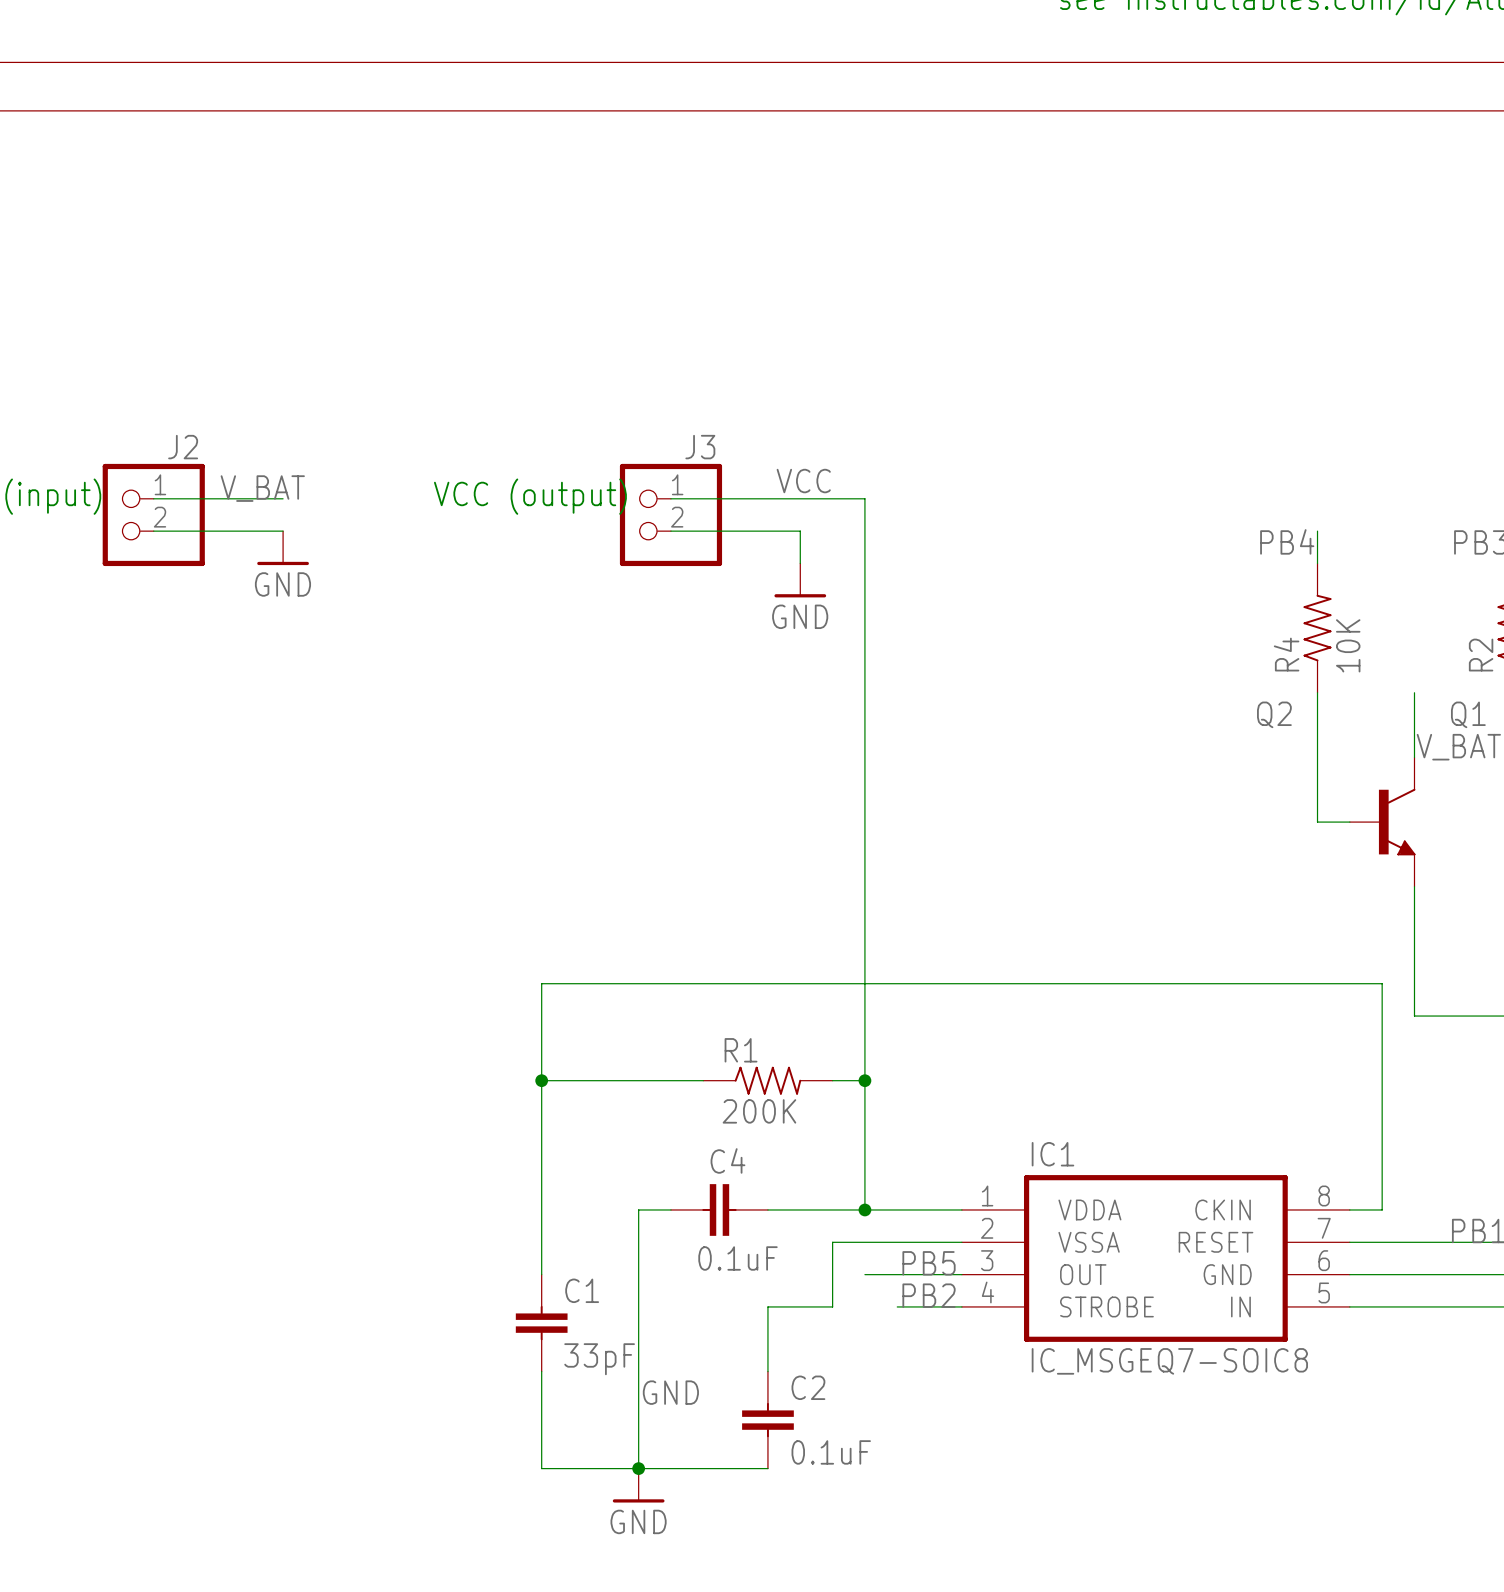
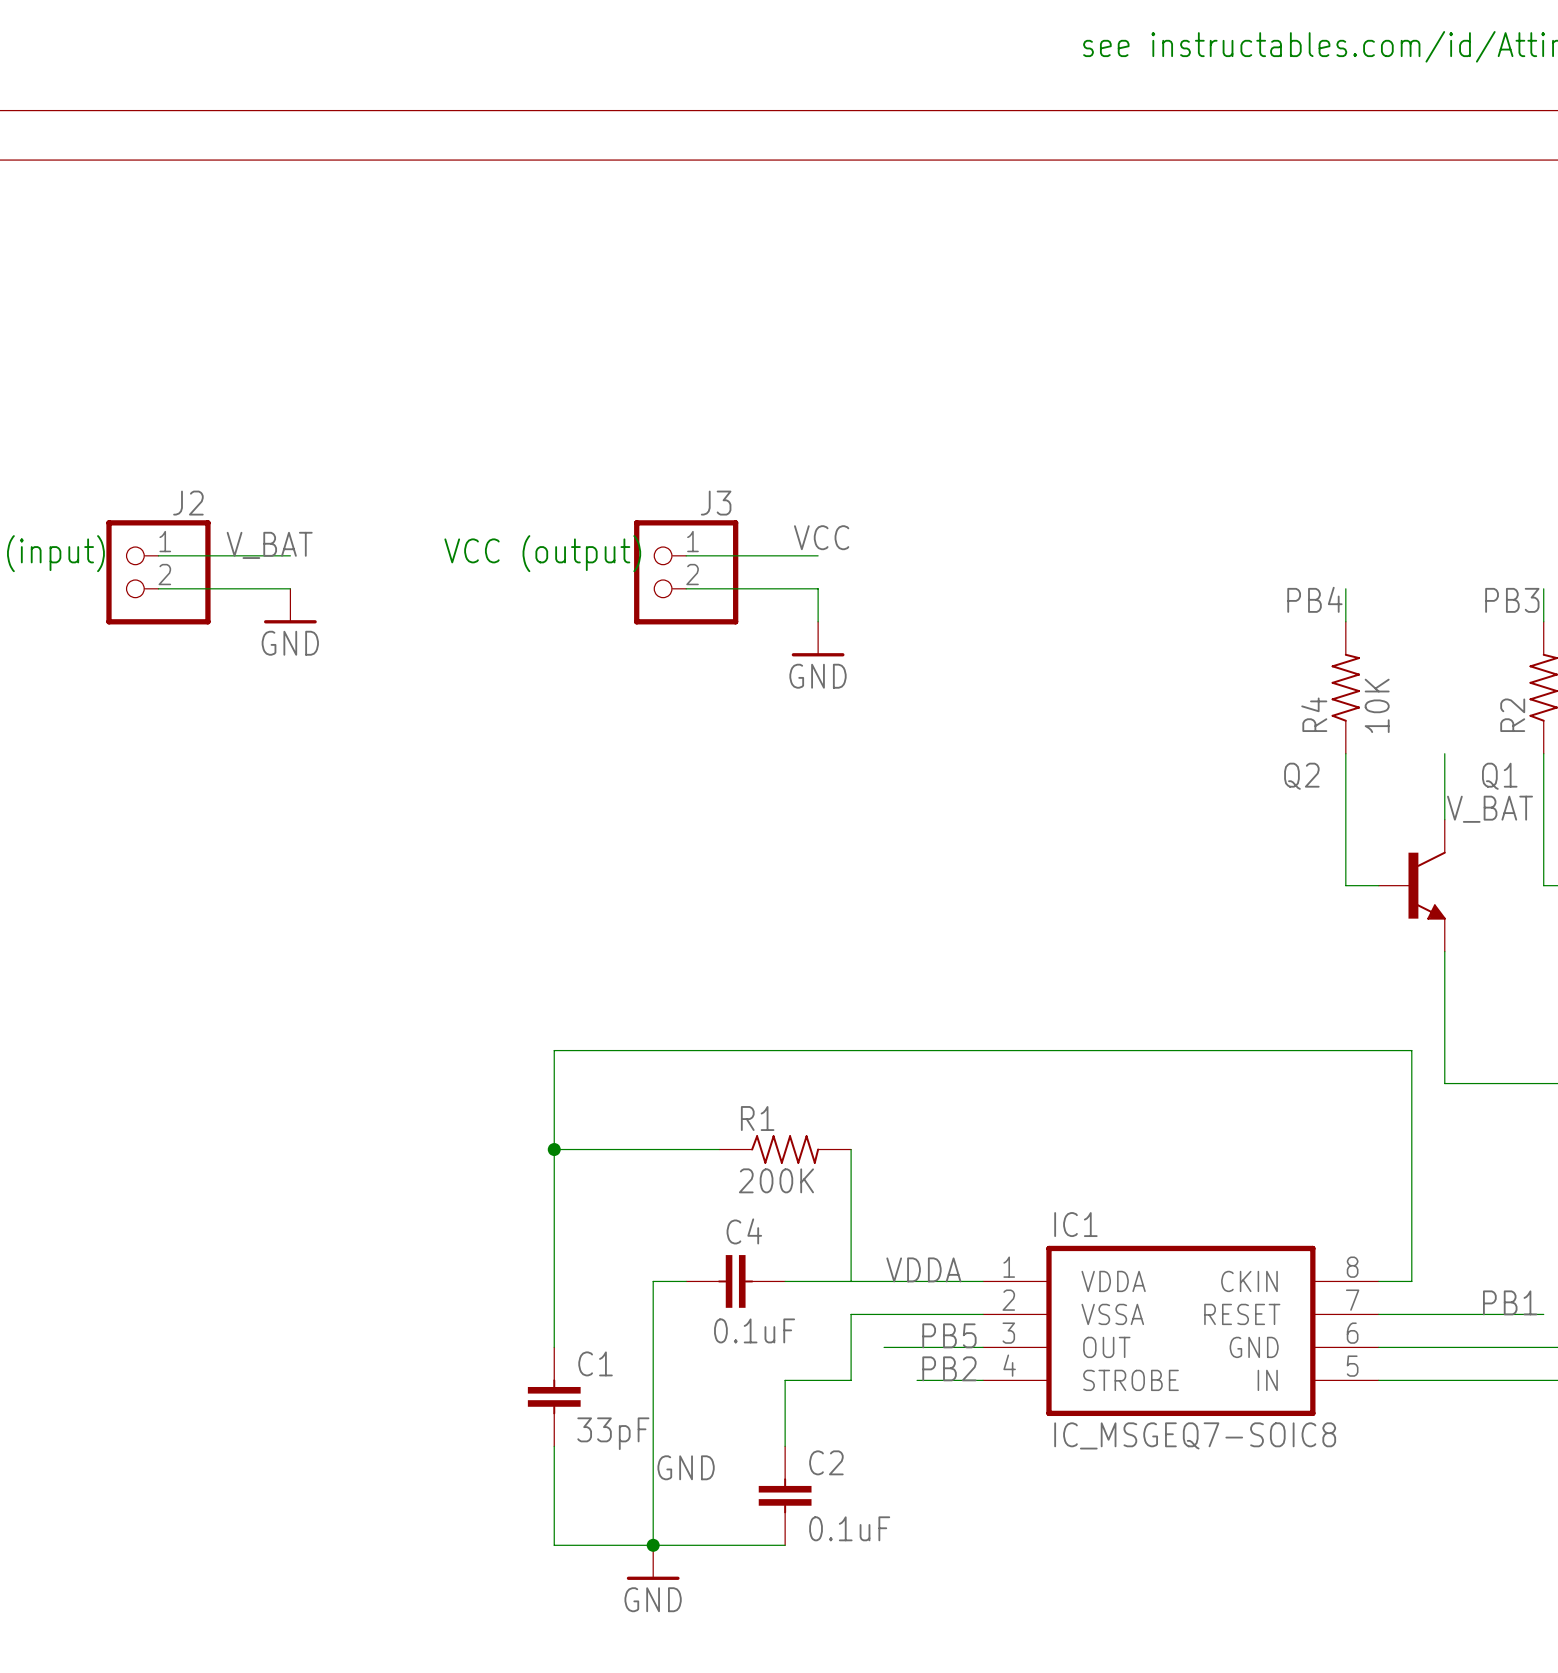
wire: (800, 498) (864, 498) (864, 1209) -> none
wire: (832, 1080) (864, 1080) -> (851, 1149) (851, 1281)
junction: (864, 1080) -> none
label: none -> VDDA (923, 1269)
junction: (864, 1209) -> none

